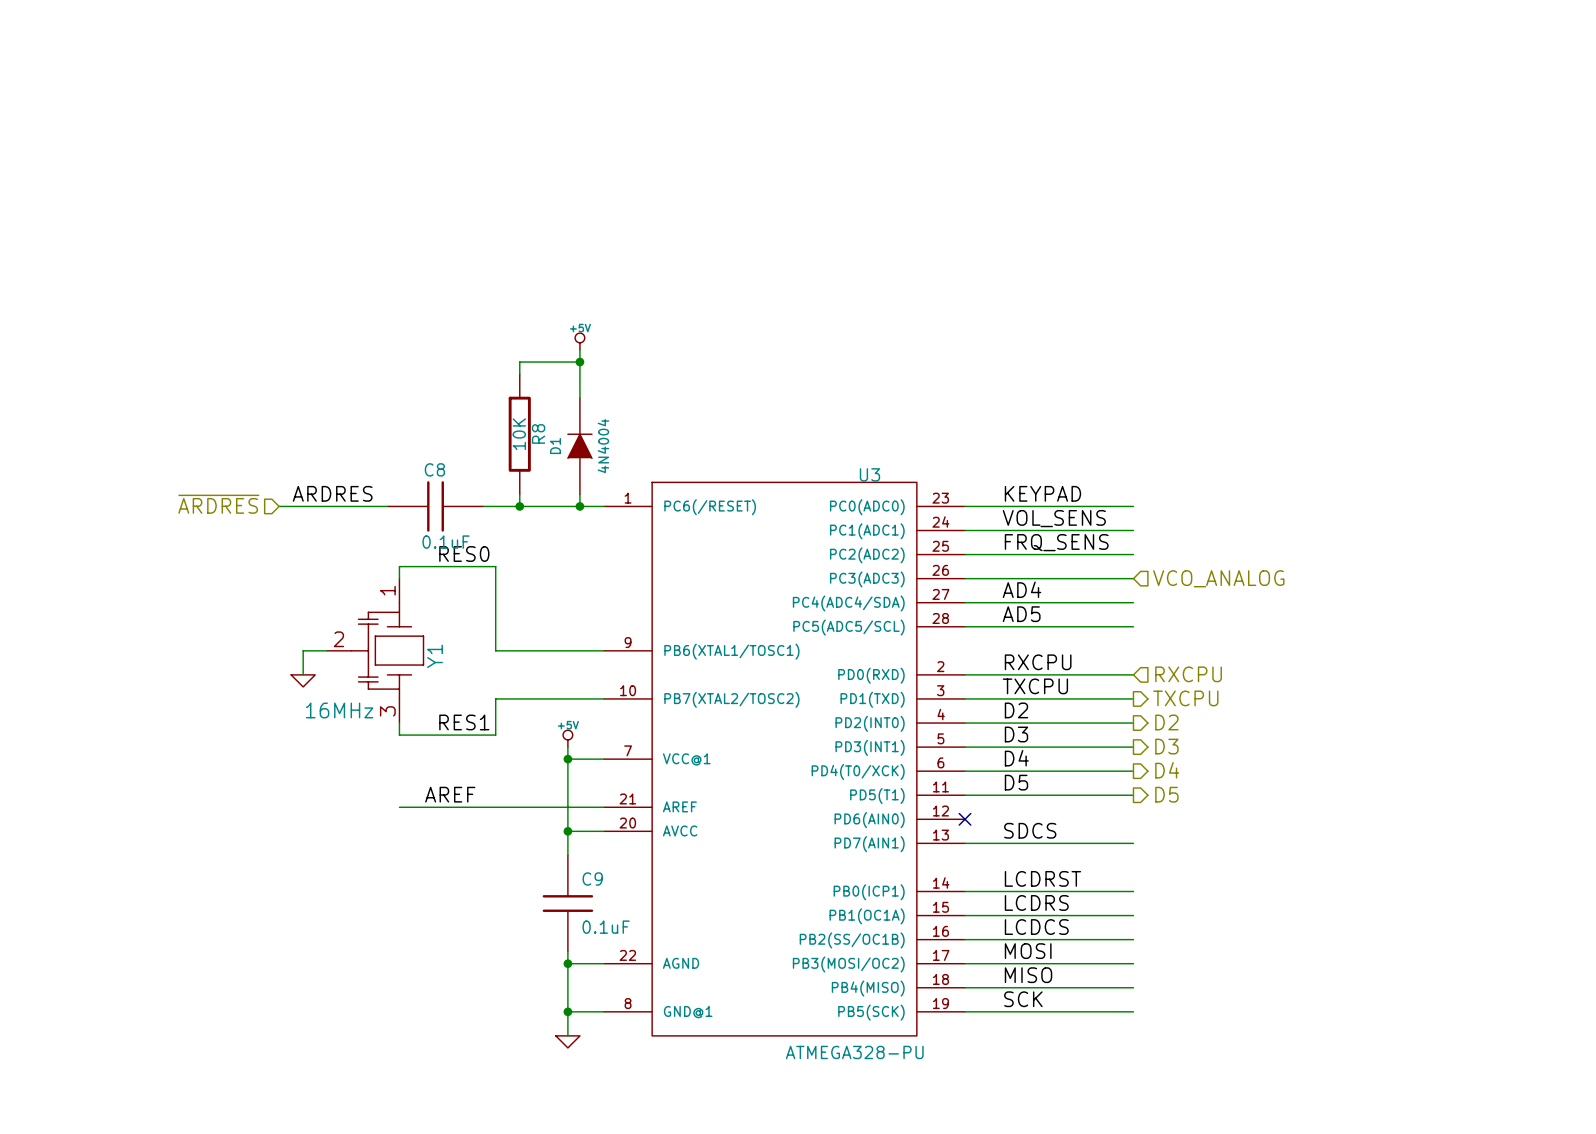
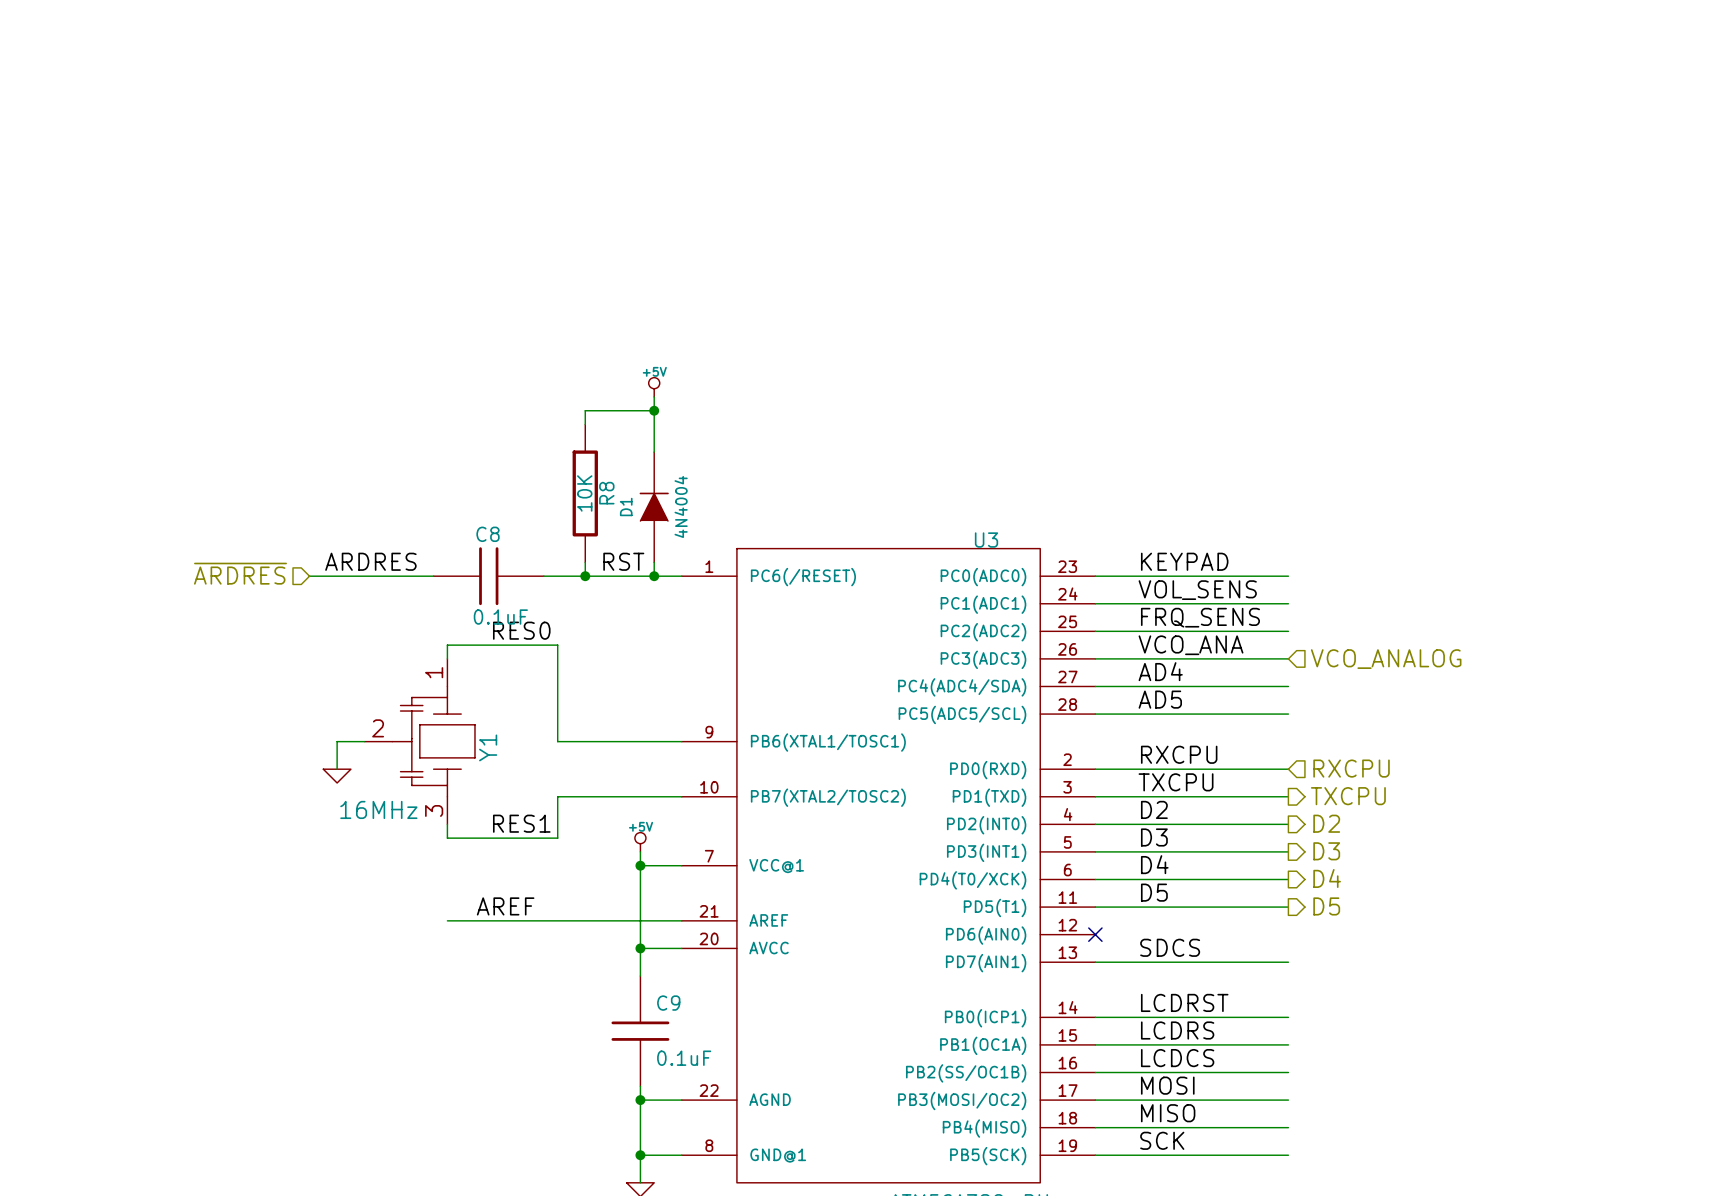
label: none -> RST (623, 561)
label: none -> VCO_ANA (1191, 645)

